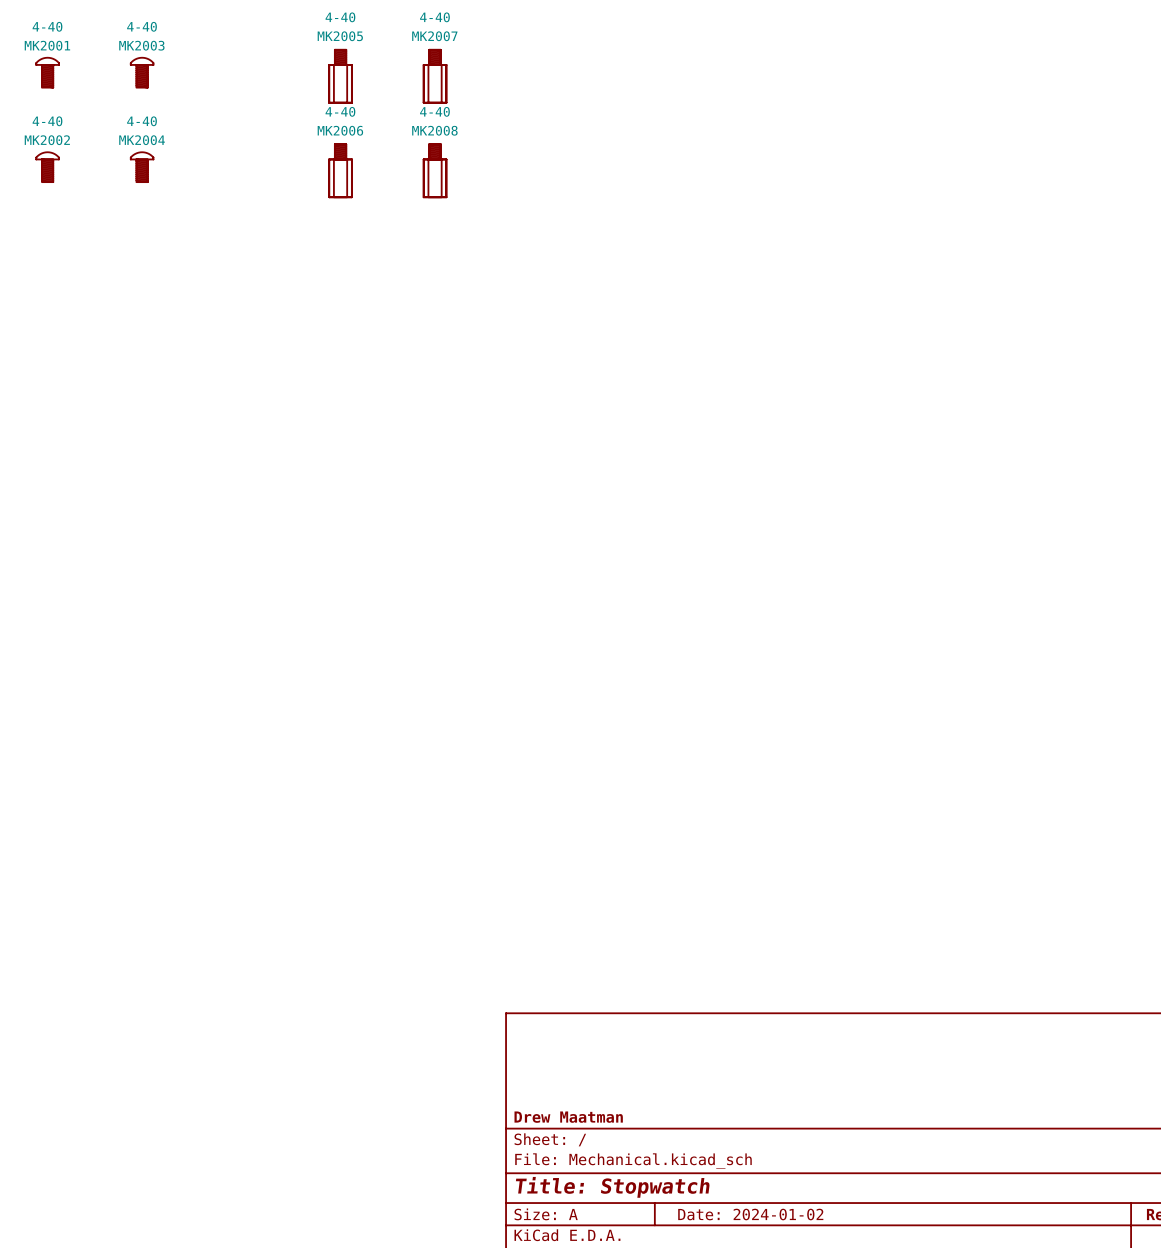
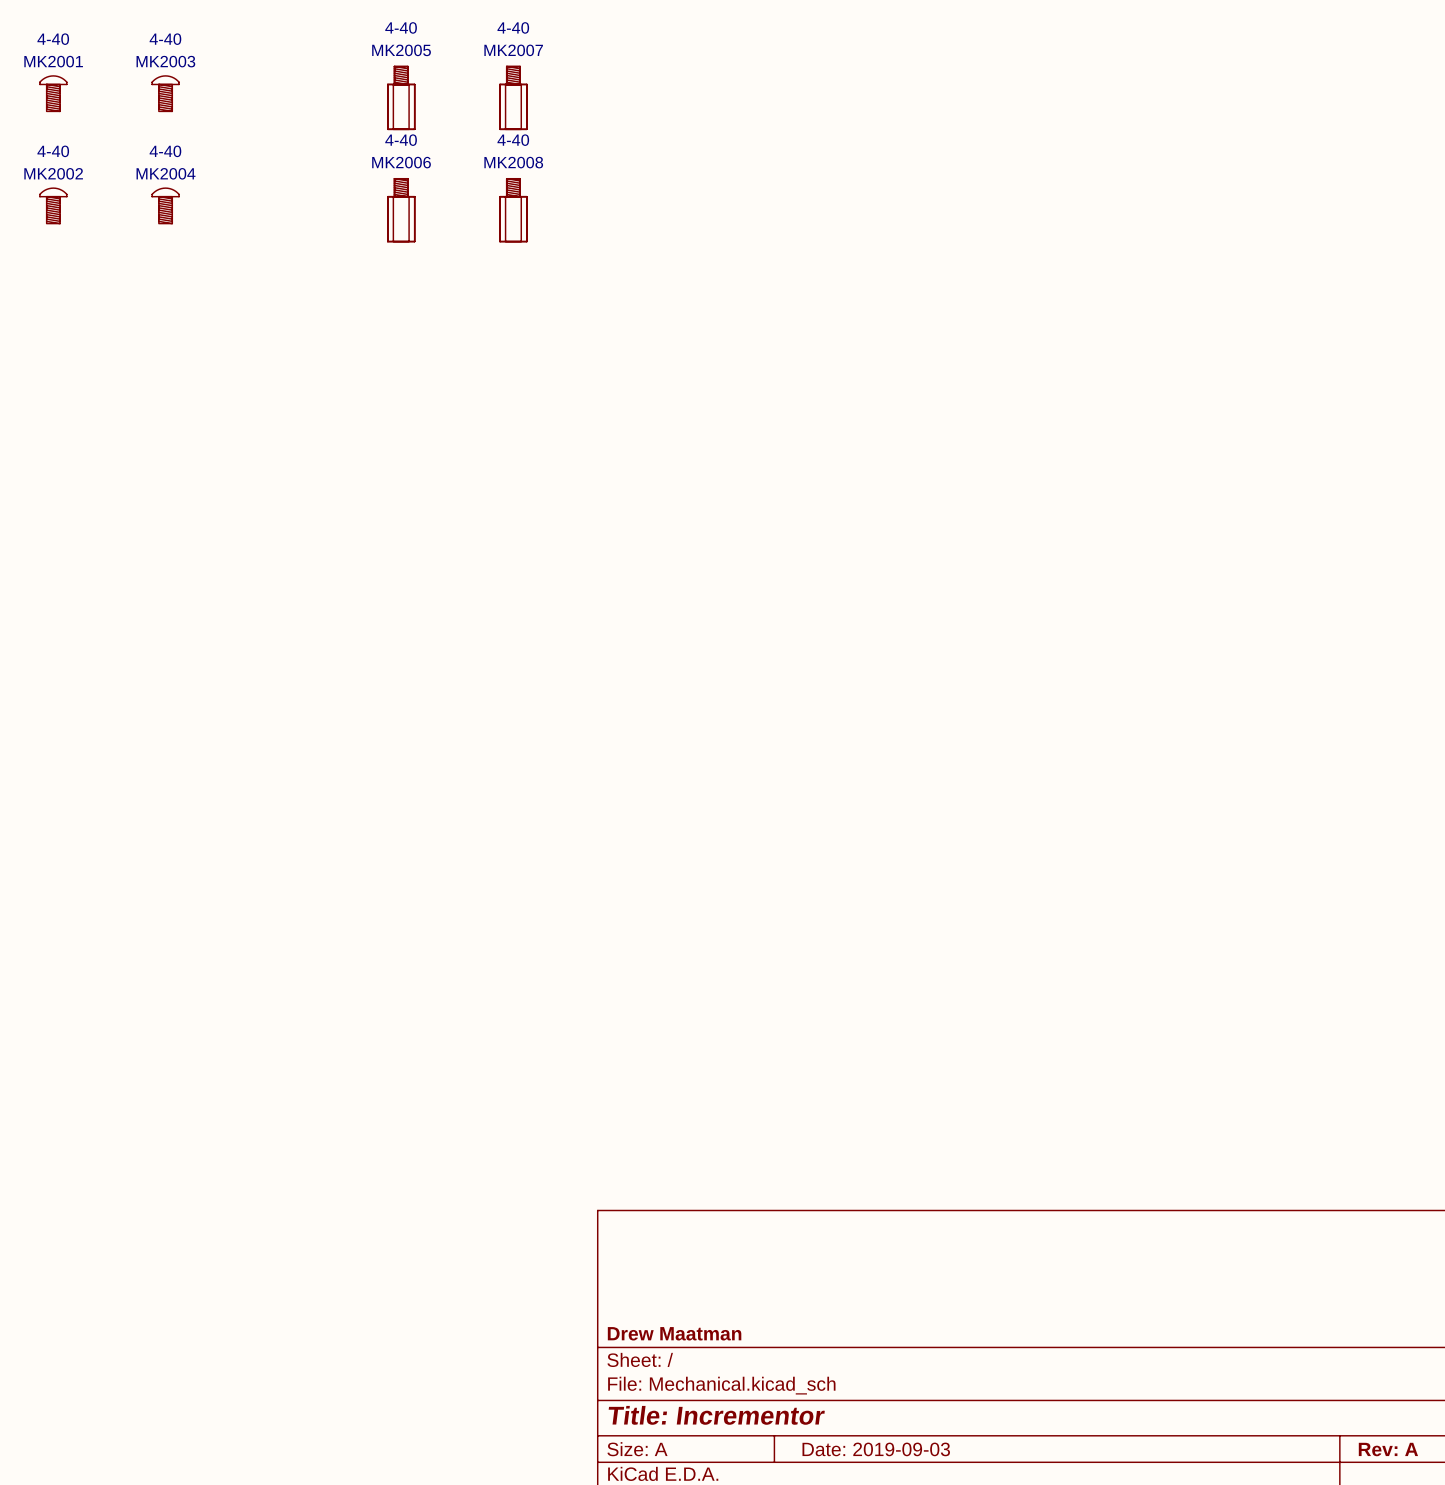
title block: Title: Stopwatch (612, 1187) -> Title: Incrementor (716, 1415)
title block: Date: 2024-01-02 (750, 1214) -> Date: 2019-09-03 (876, 1449)

